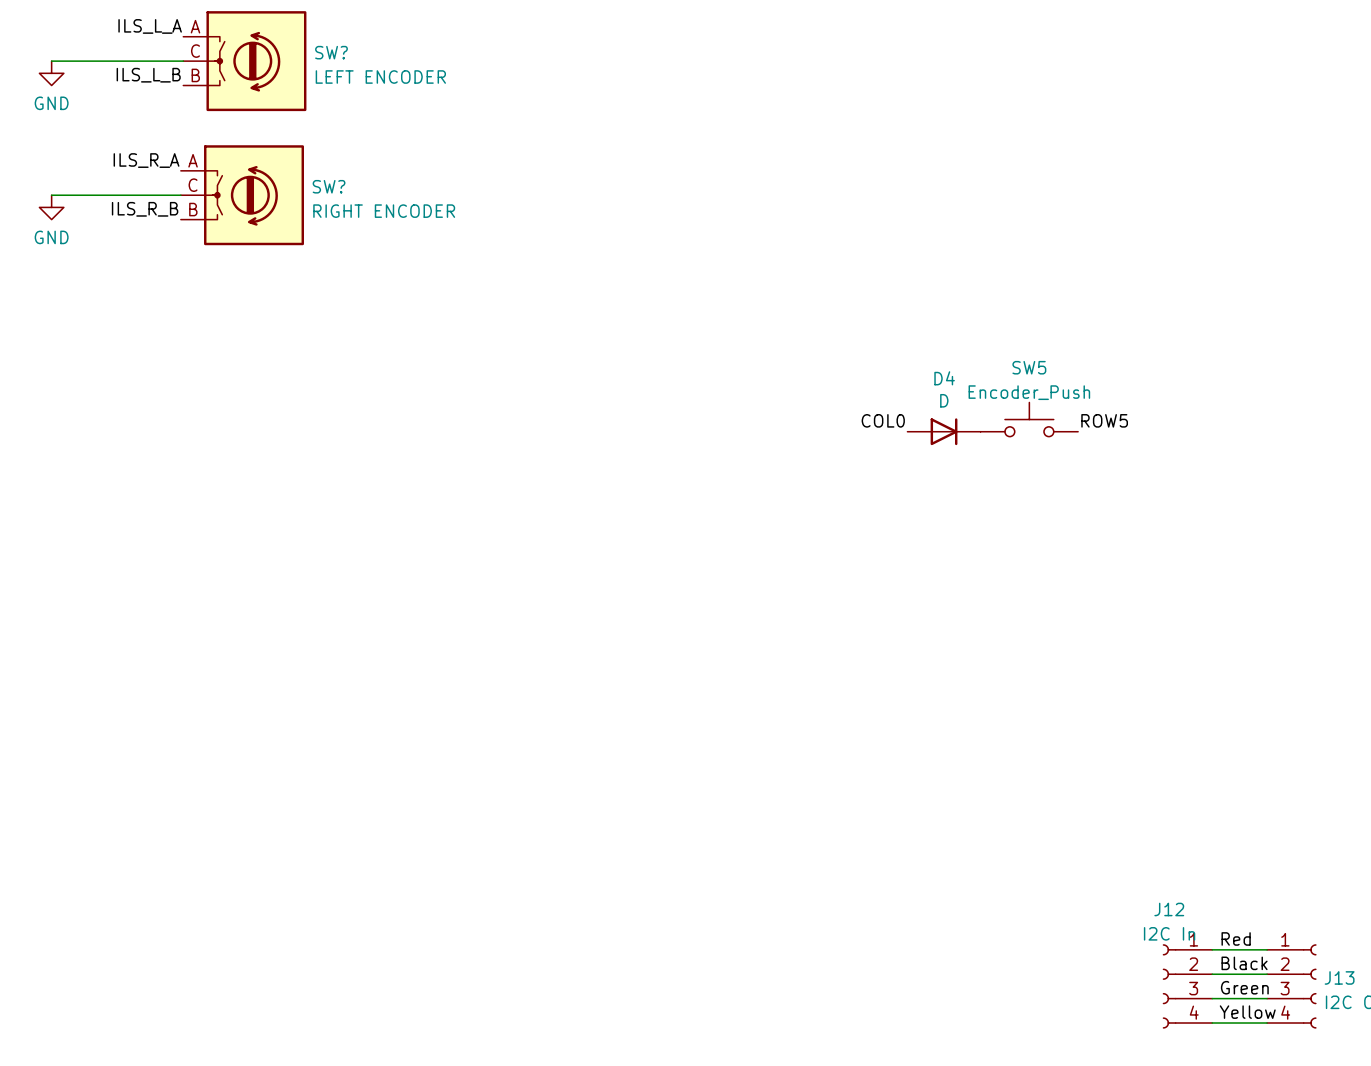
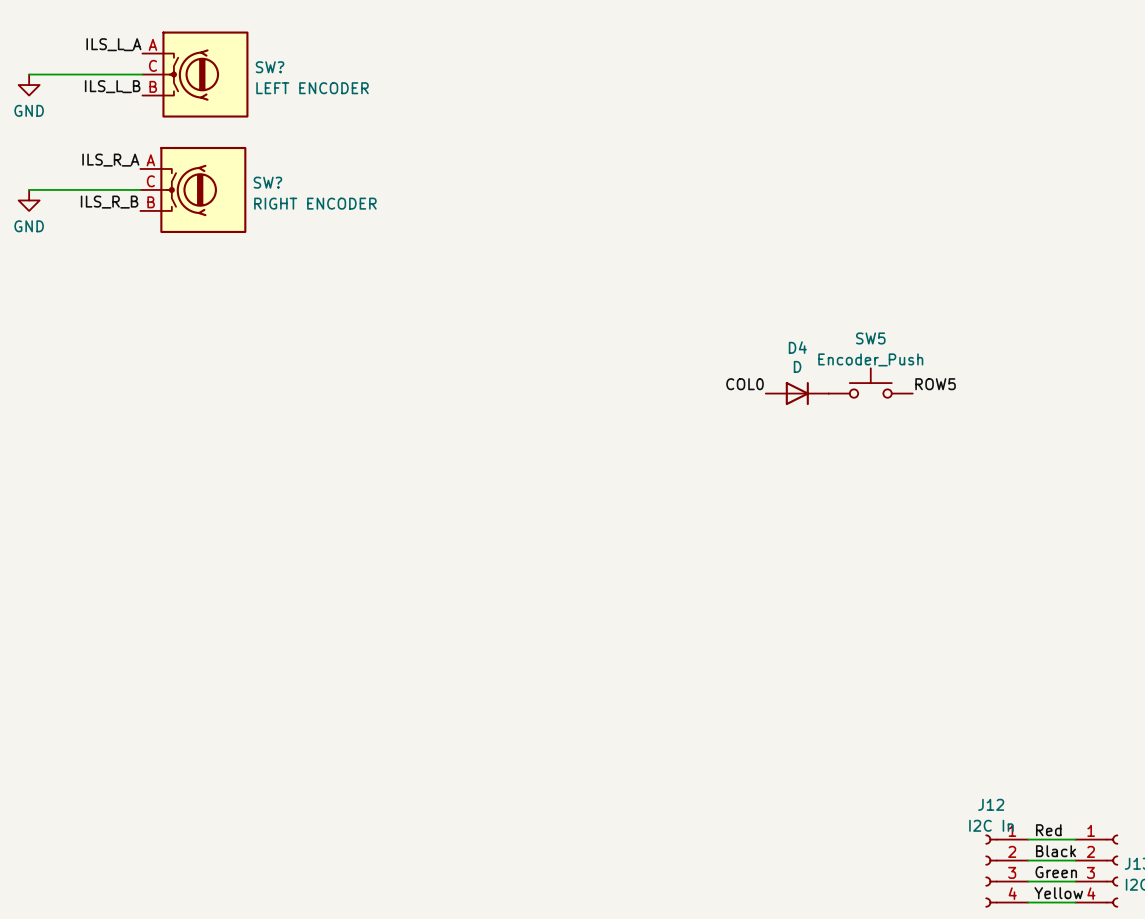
SW? symbol: [183, 11, 307, 112] -> [142, 31, 249, 118]
SW? symbol: [180, 145, 304, 246] -> [140, 146, 247, 234]

